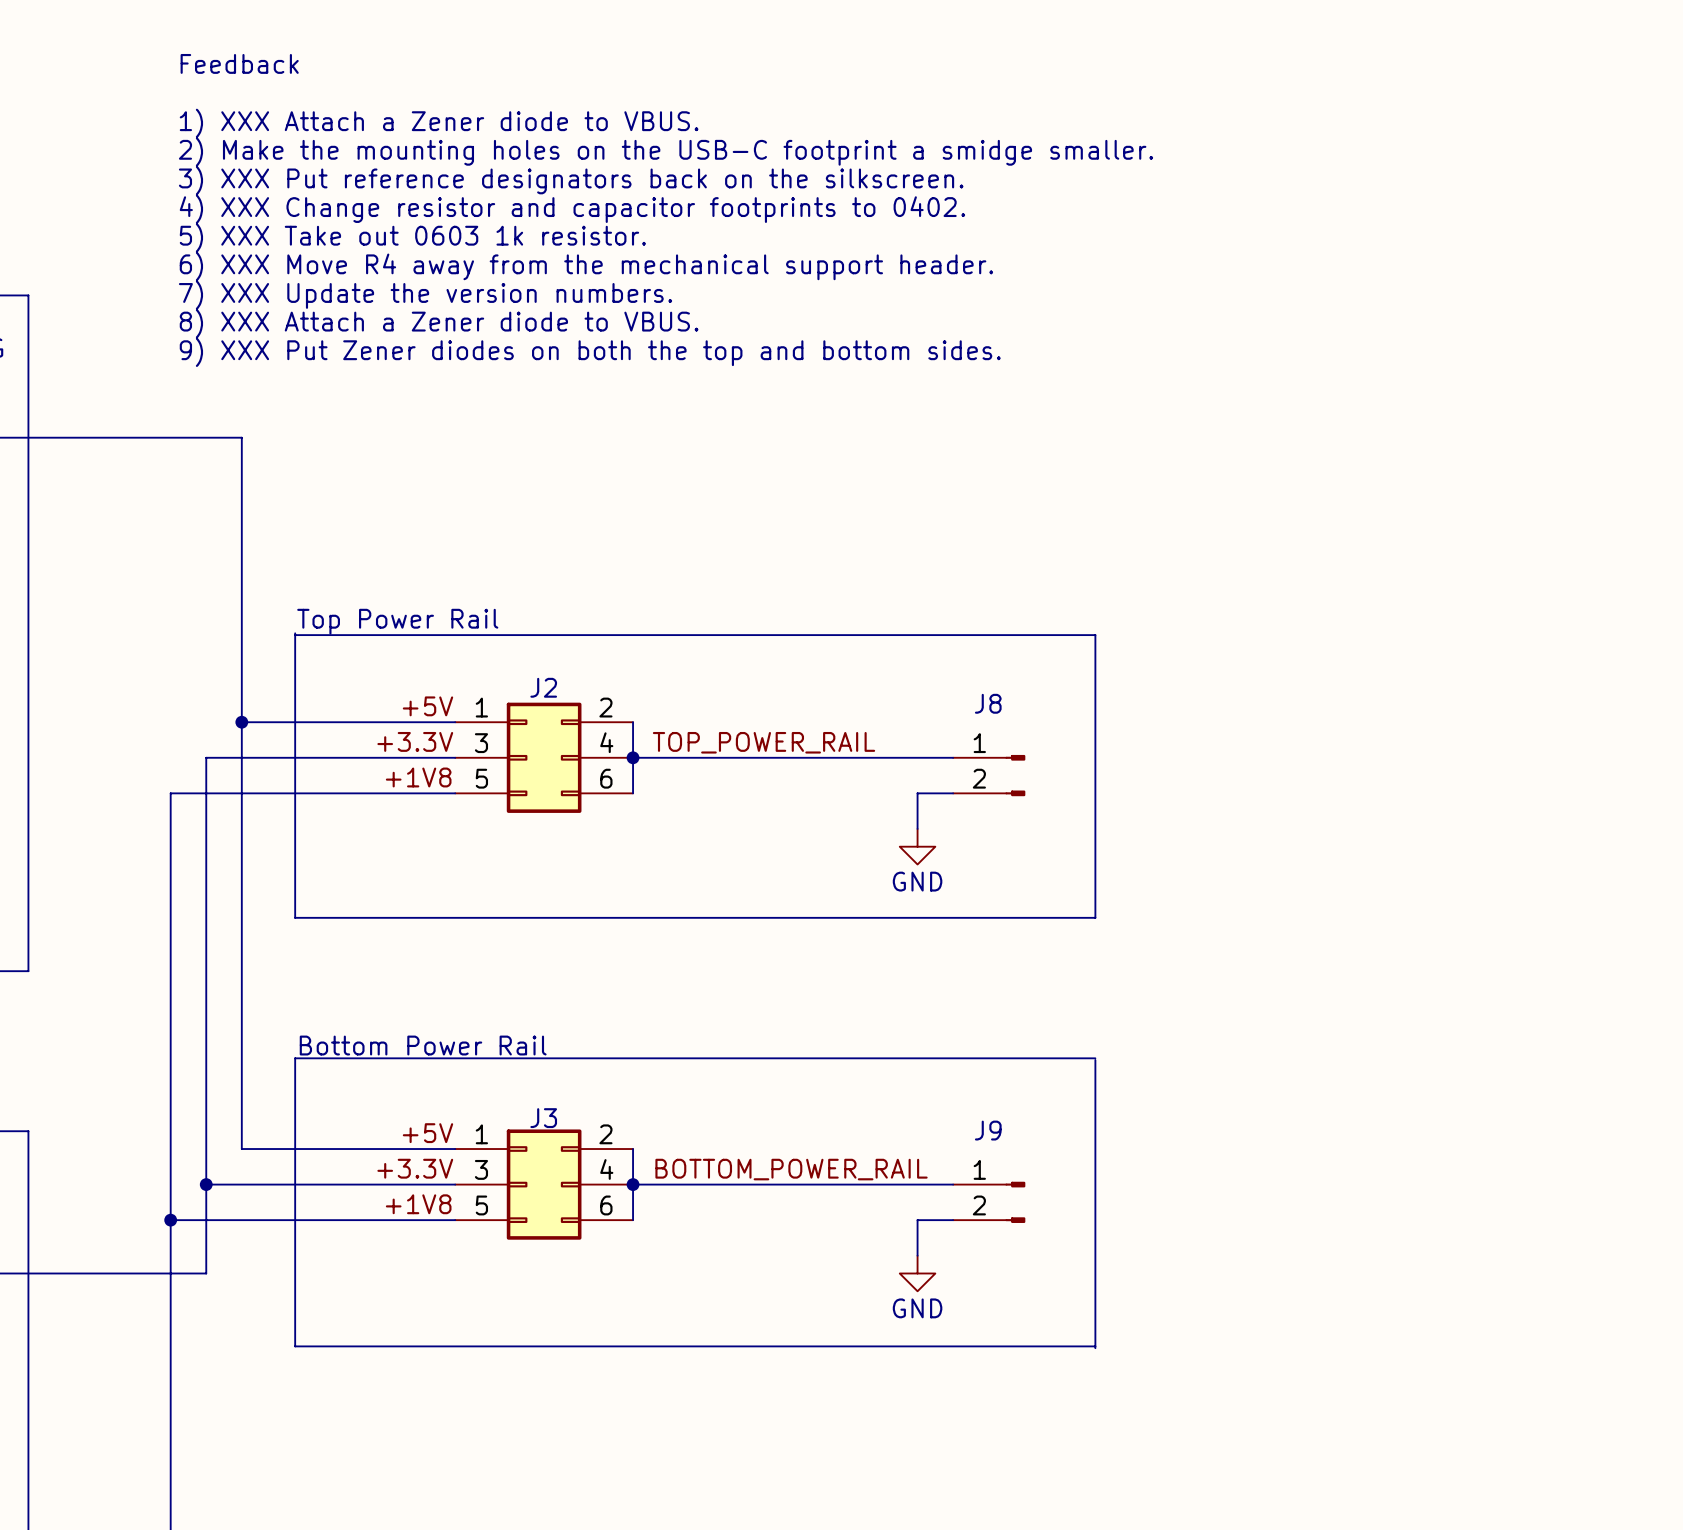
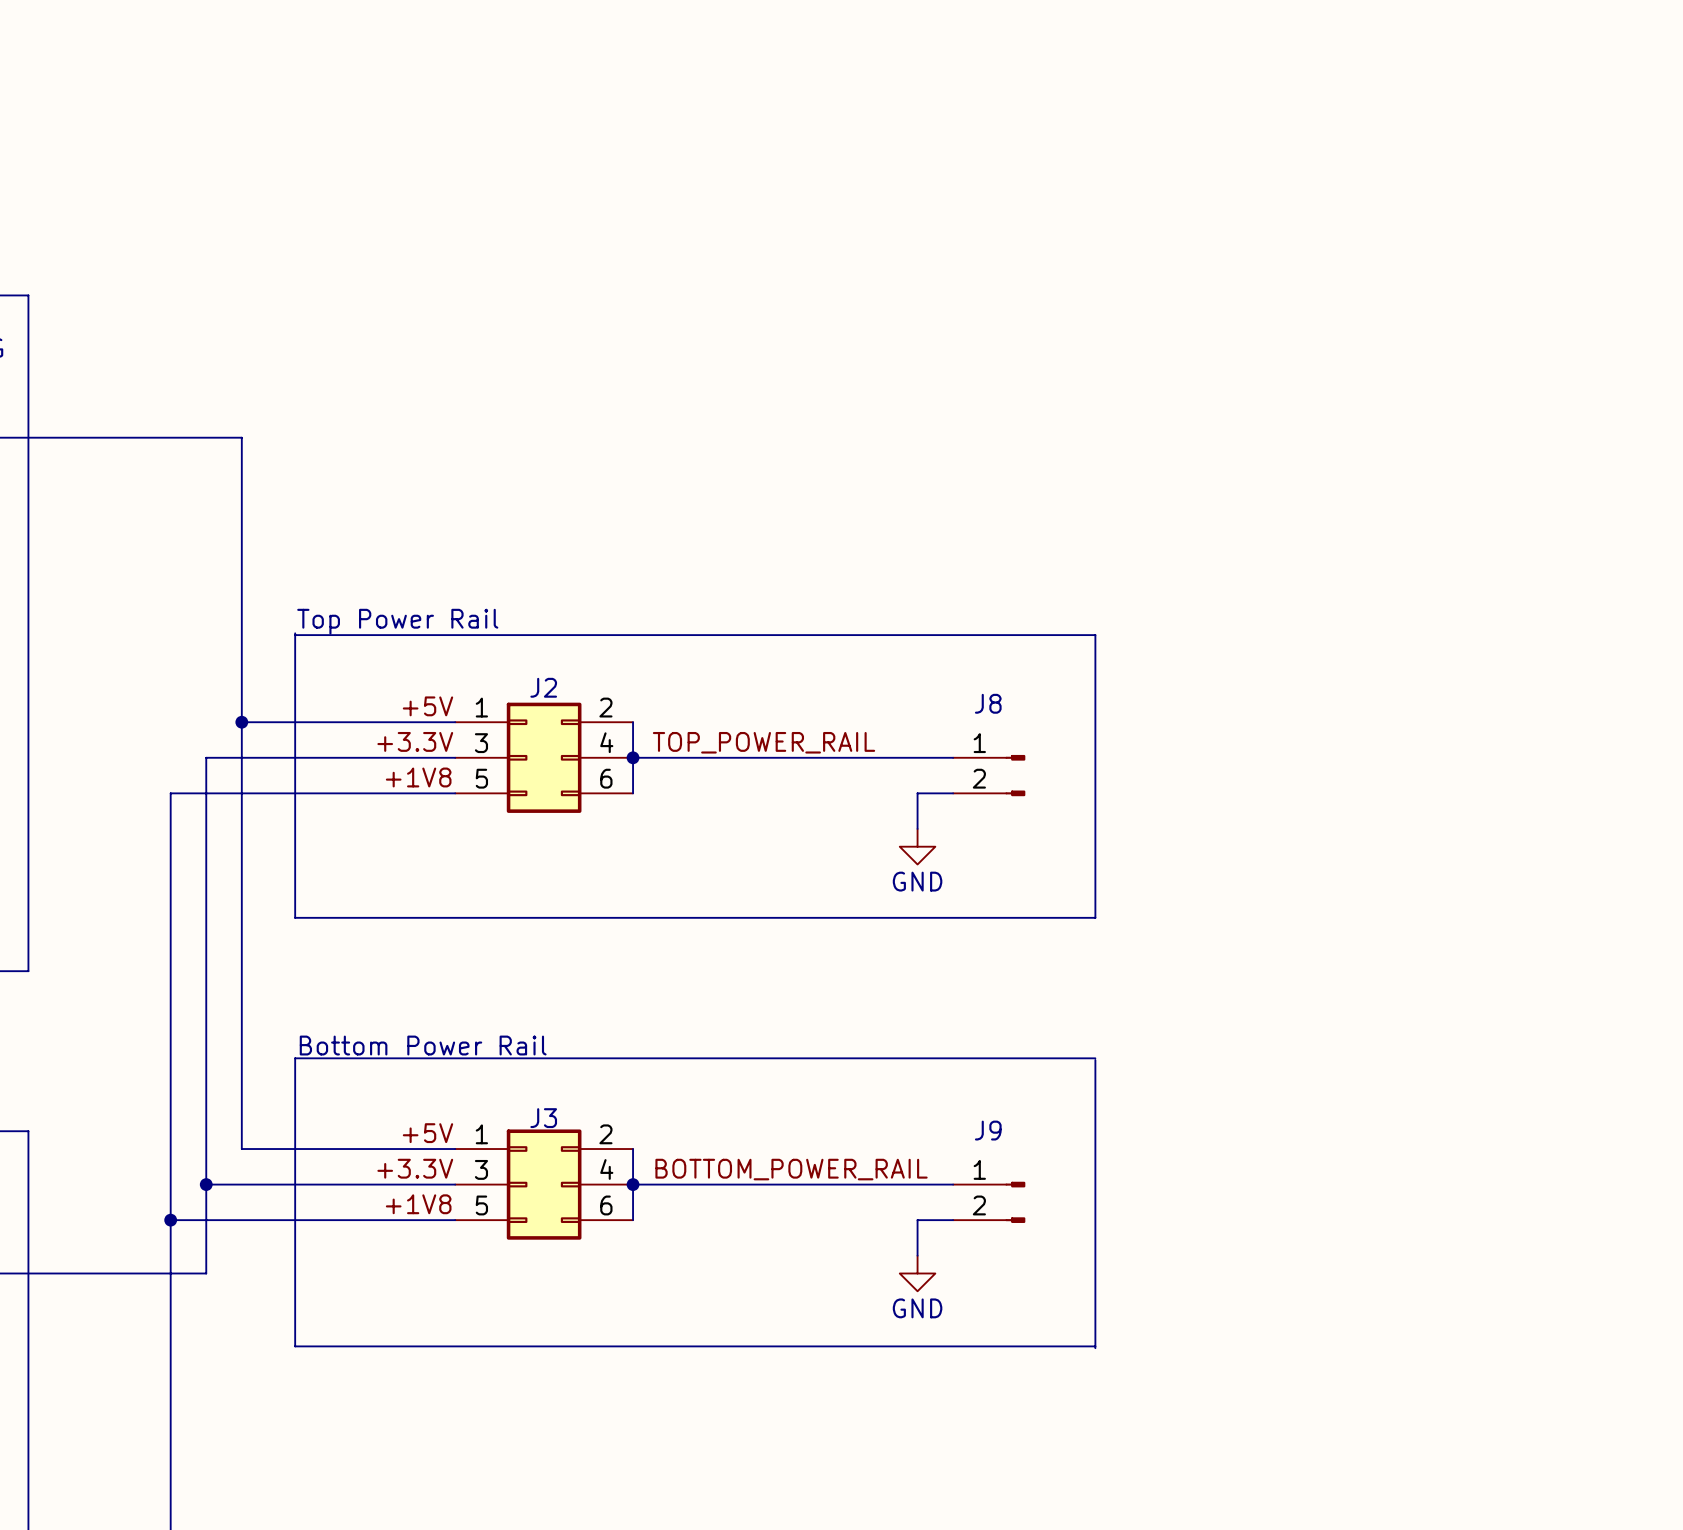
text: Feedback (239, 63) -> none
text: 1) XXX Attach a Zener diode to VBUS. (439, 123) -> none
text: 2) Make the mounting holes on the USB-C footprint a smidge smaller. (666, 151) -> none
text: 3) XXX Put reference designators back on the silkscreen. (571, 180) -> none
text: 4) XXX Change resistor and capacitor footprints to 0402. (572, 209) -> none
text: 5) XXX Take out 0603 1k resistor. (412, 237) -> none
text: 6) XXX Move R4 away from the mechanical support header. (586, 266) -> none
text: 7) XXX Update the version numbers. (425, 295) -> none
text: 8) XXX Attach a Zener diode to VBUS. (439, 323) -> none
text: 9) XXX Put Zener diodes on both the top and bottom sides. (590, 352) -> none

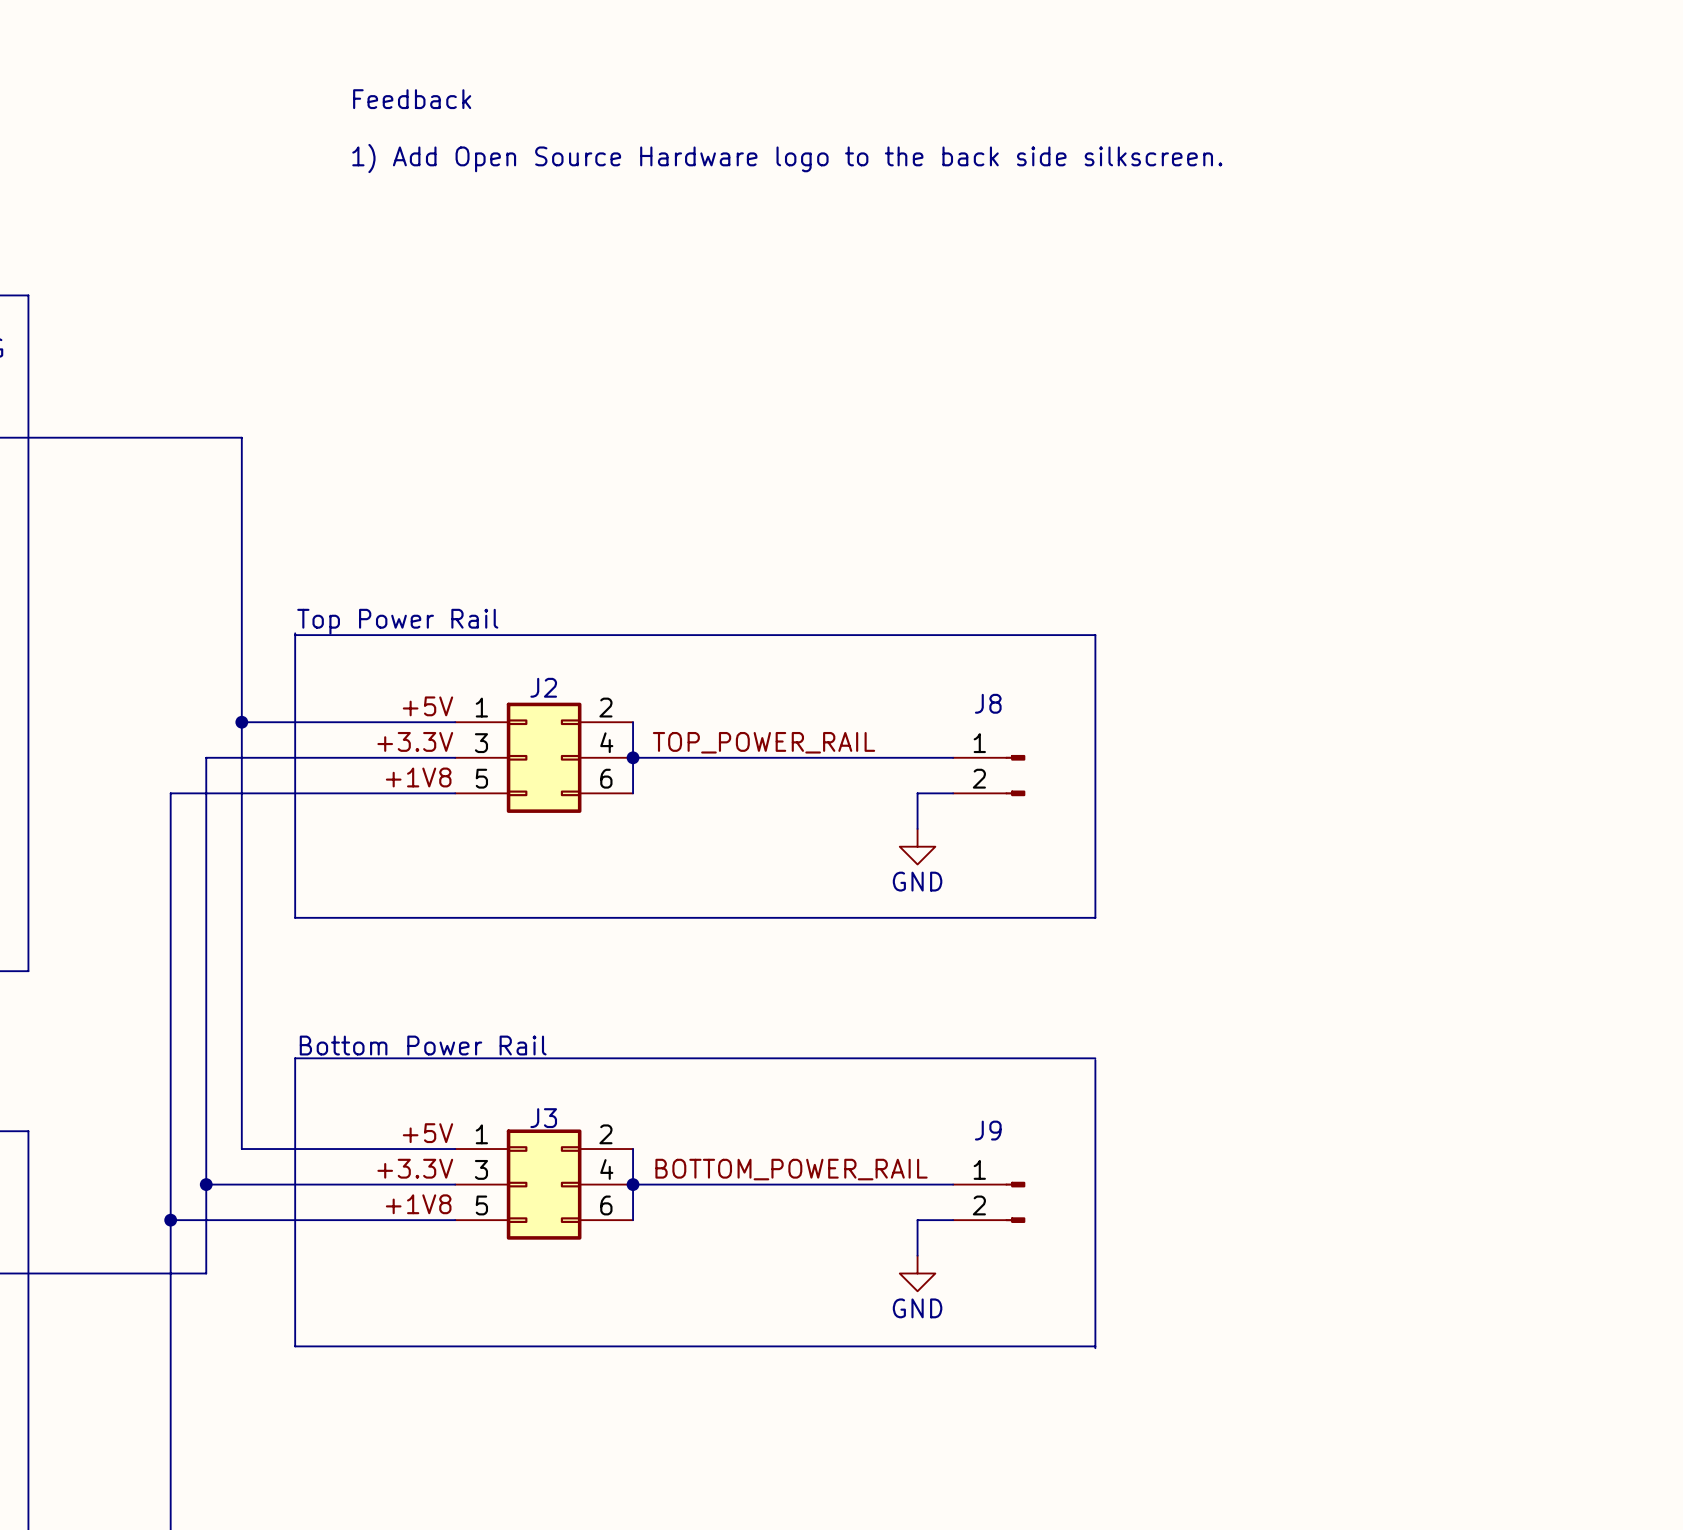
text: none -> Feedback (412, 99)
text: none -> 1) Add Open Source Hardware logo to the back side silkscreen. (787, 158)

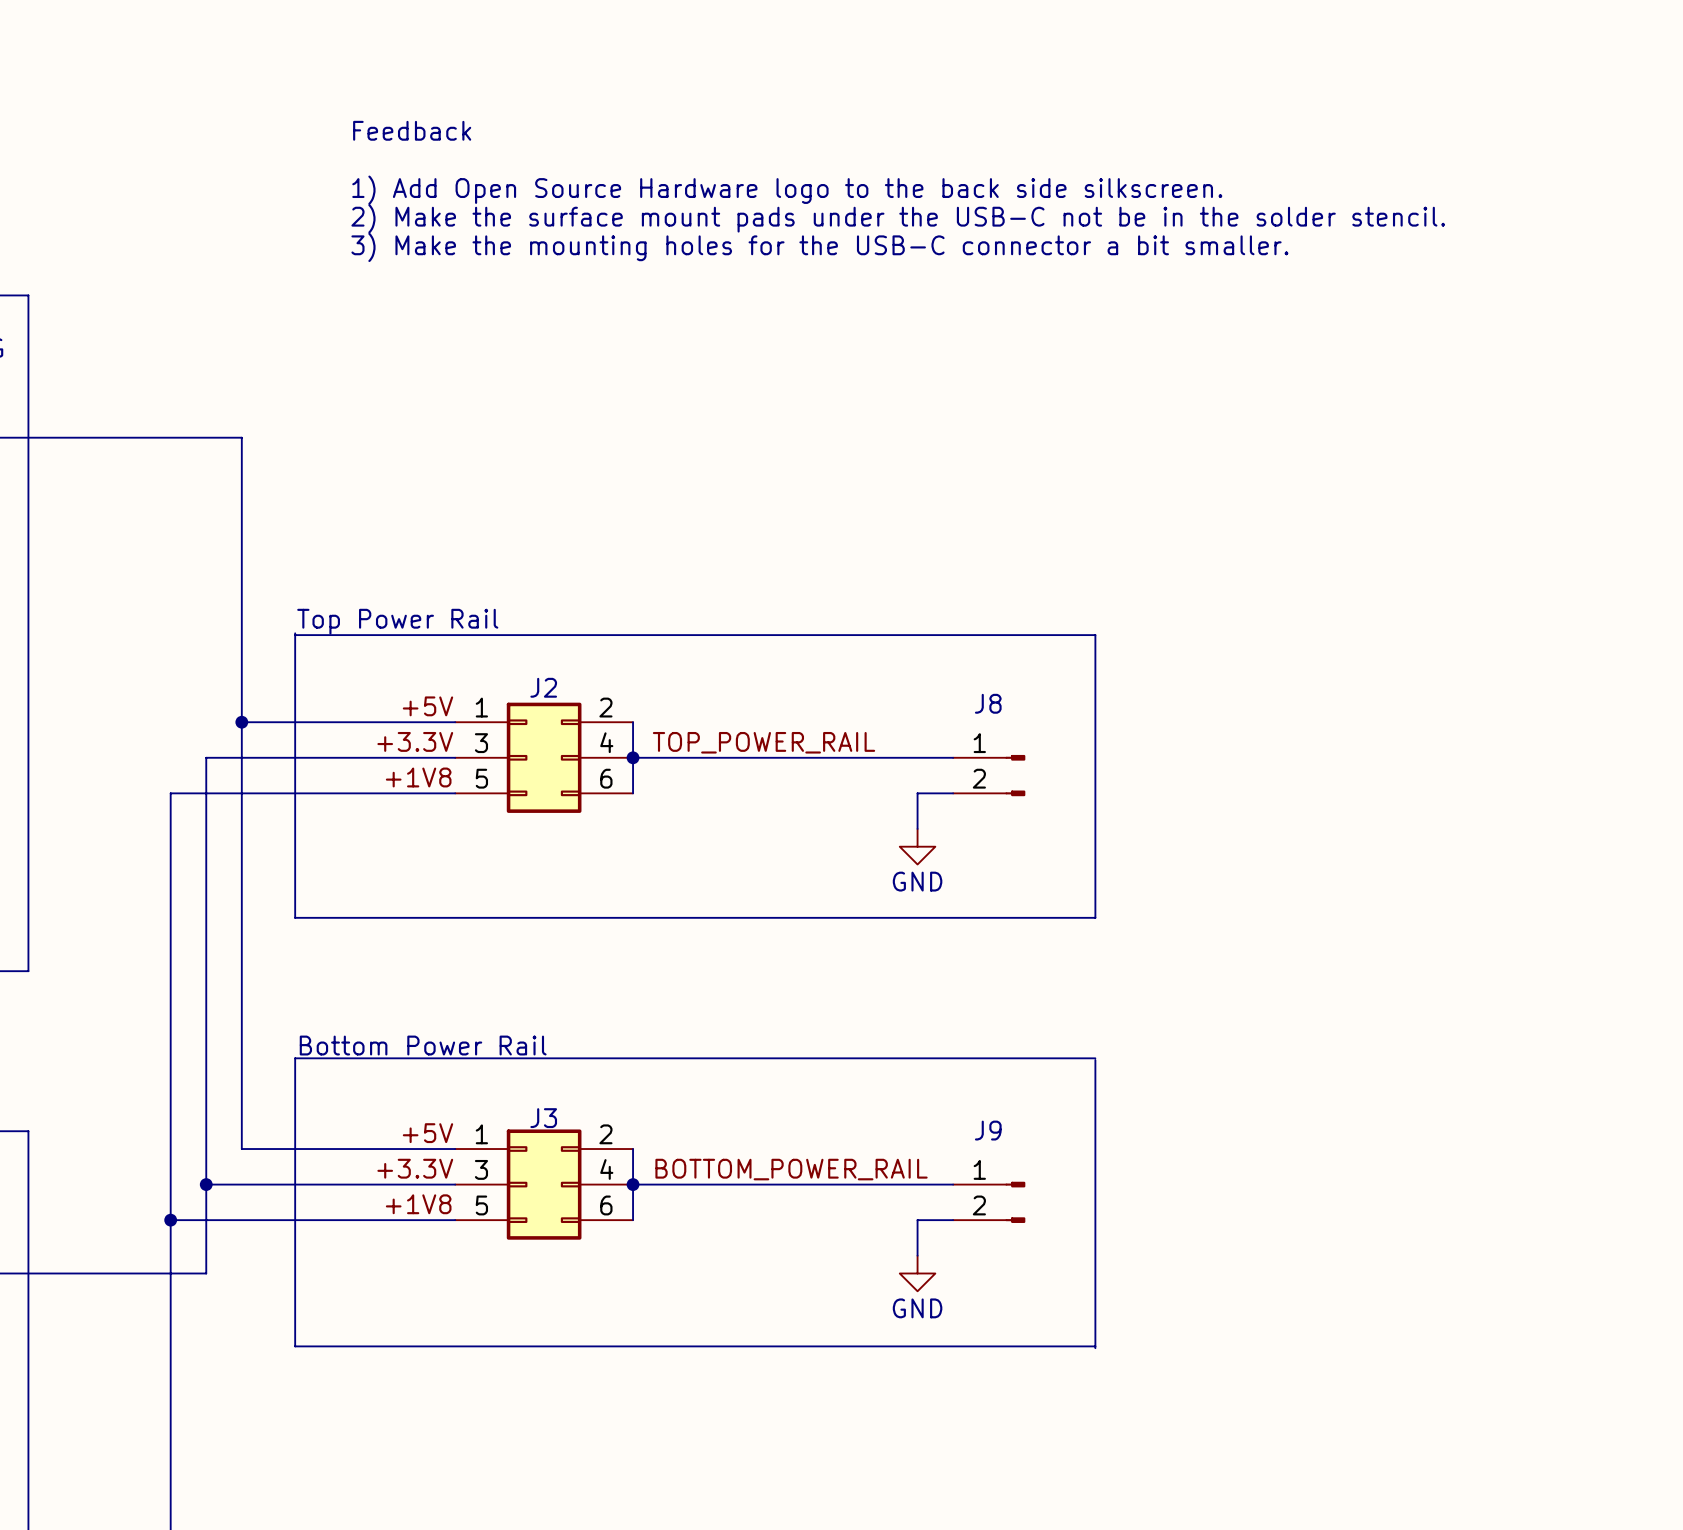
text position: Feedback (412, 99) -> Feedback (412, 130)
text position: 1) Add Open Source Hardware logo to the back side silkscreen. (787, 158) -> 1) Add Open Source Hardware logo to the back side silkscreen. (787, 190)
text: none -> 2) Make the surface mount pads under the USB-C not be in the solder stencil. (898, 218)
text: none -> 3) Make the mounting holes for the USB-C connector a bit smaller. (819, 247)

